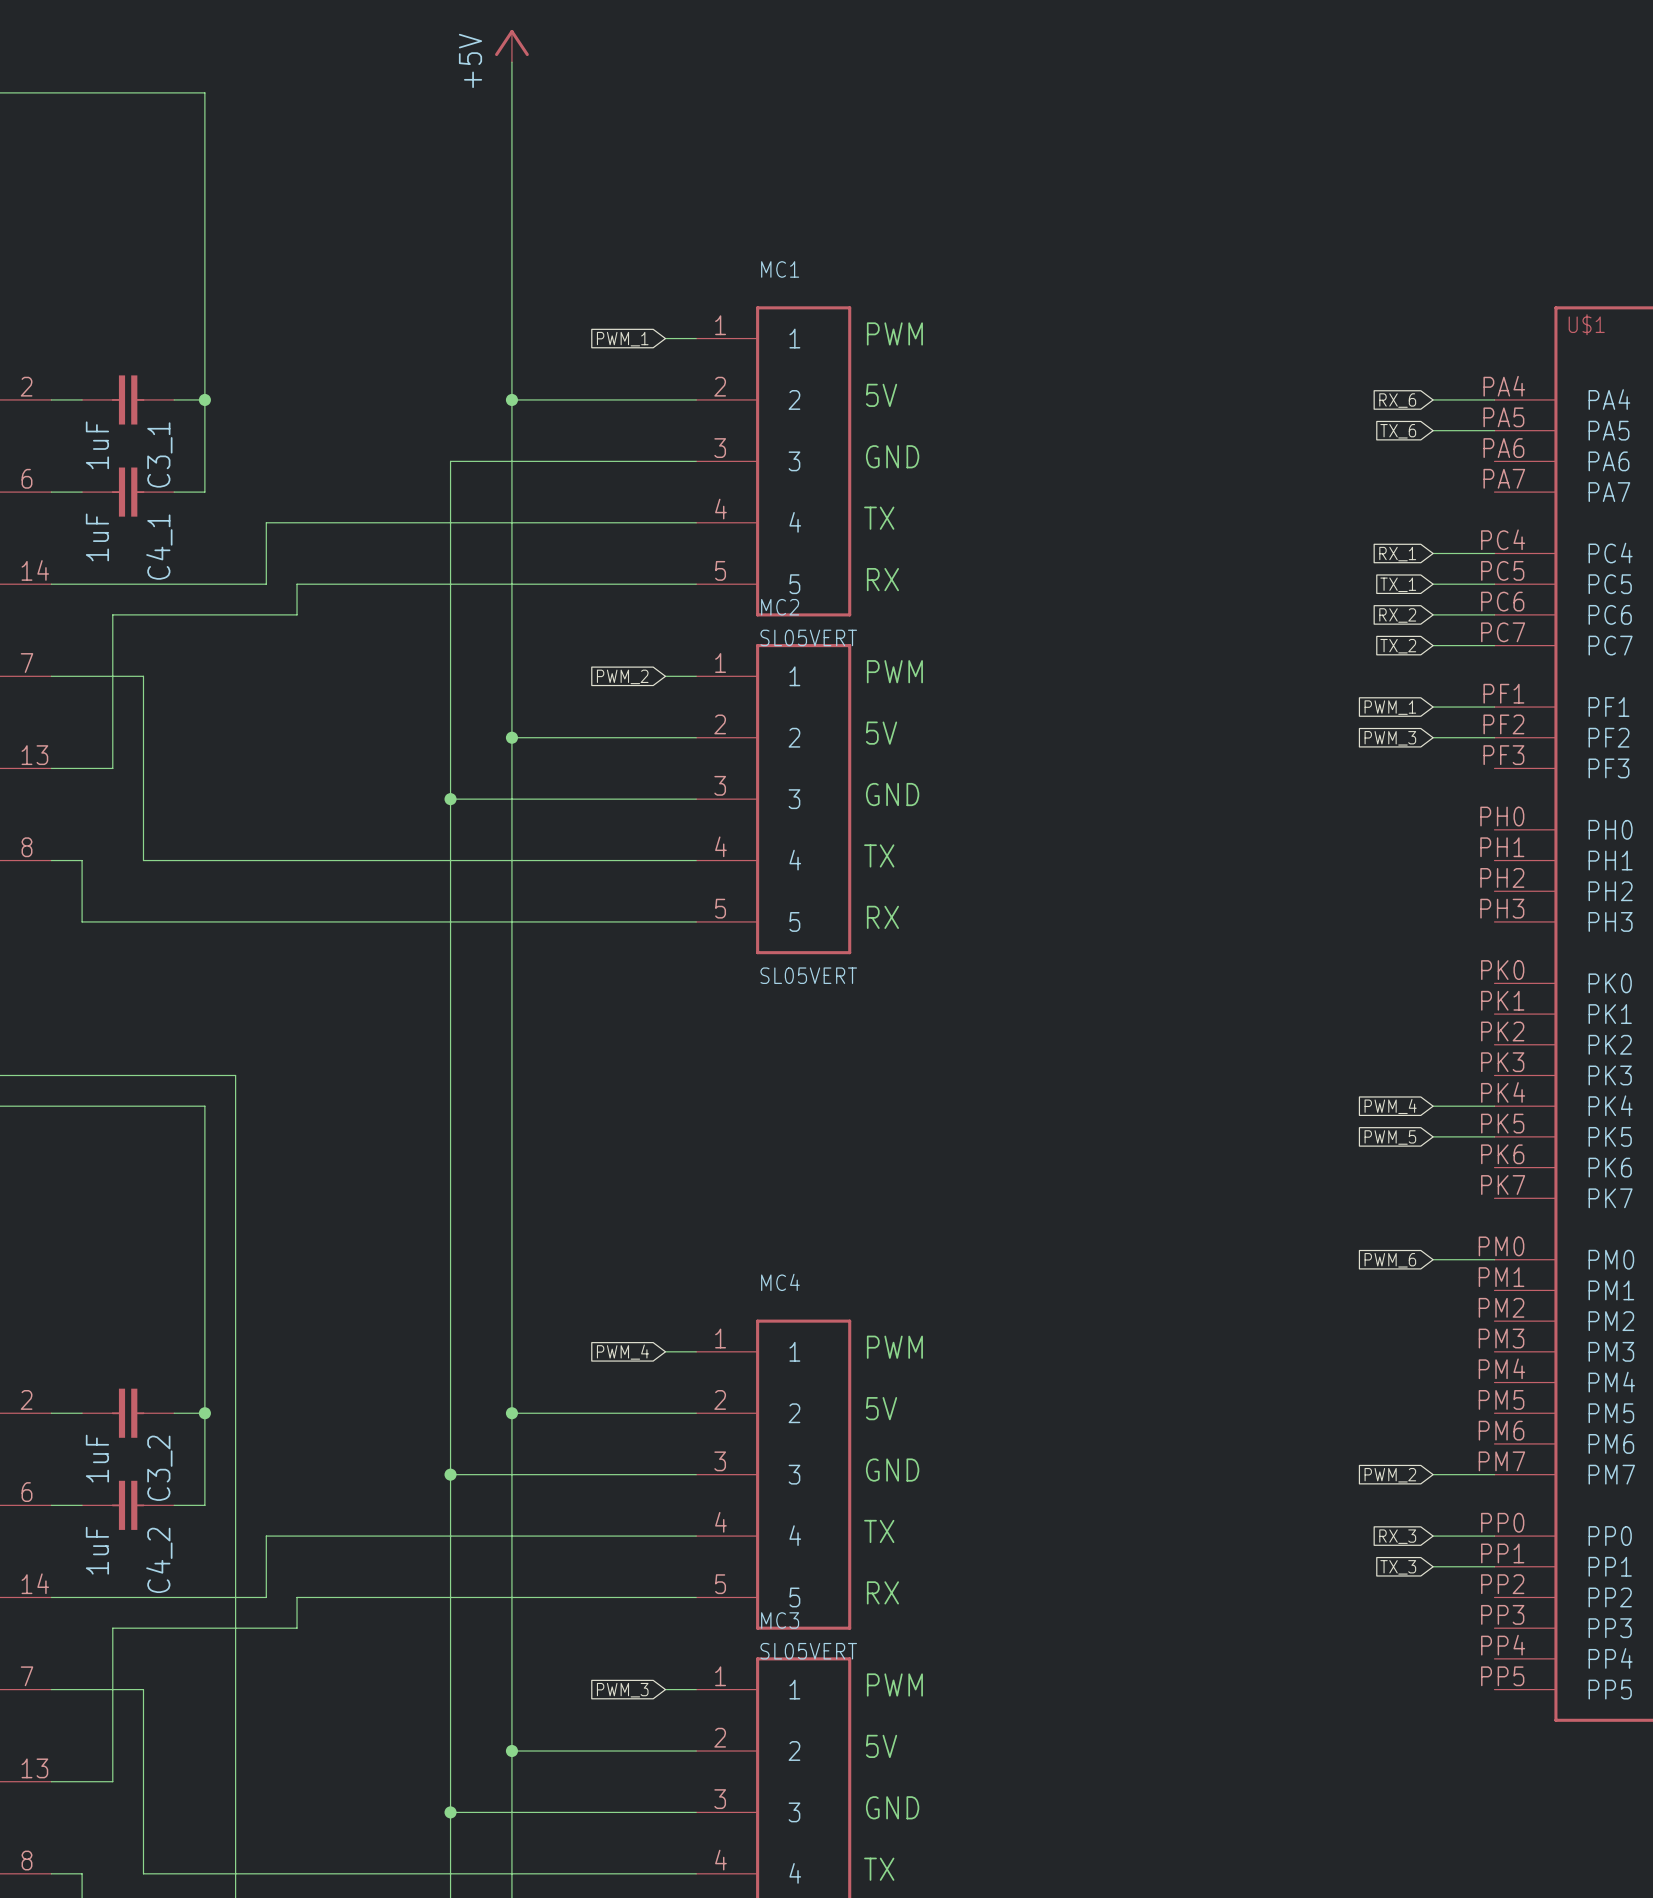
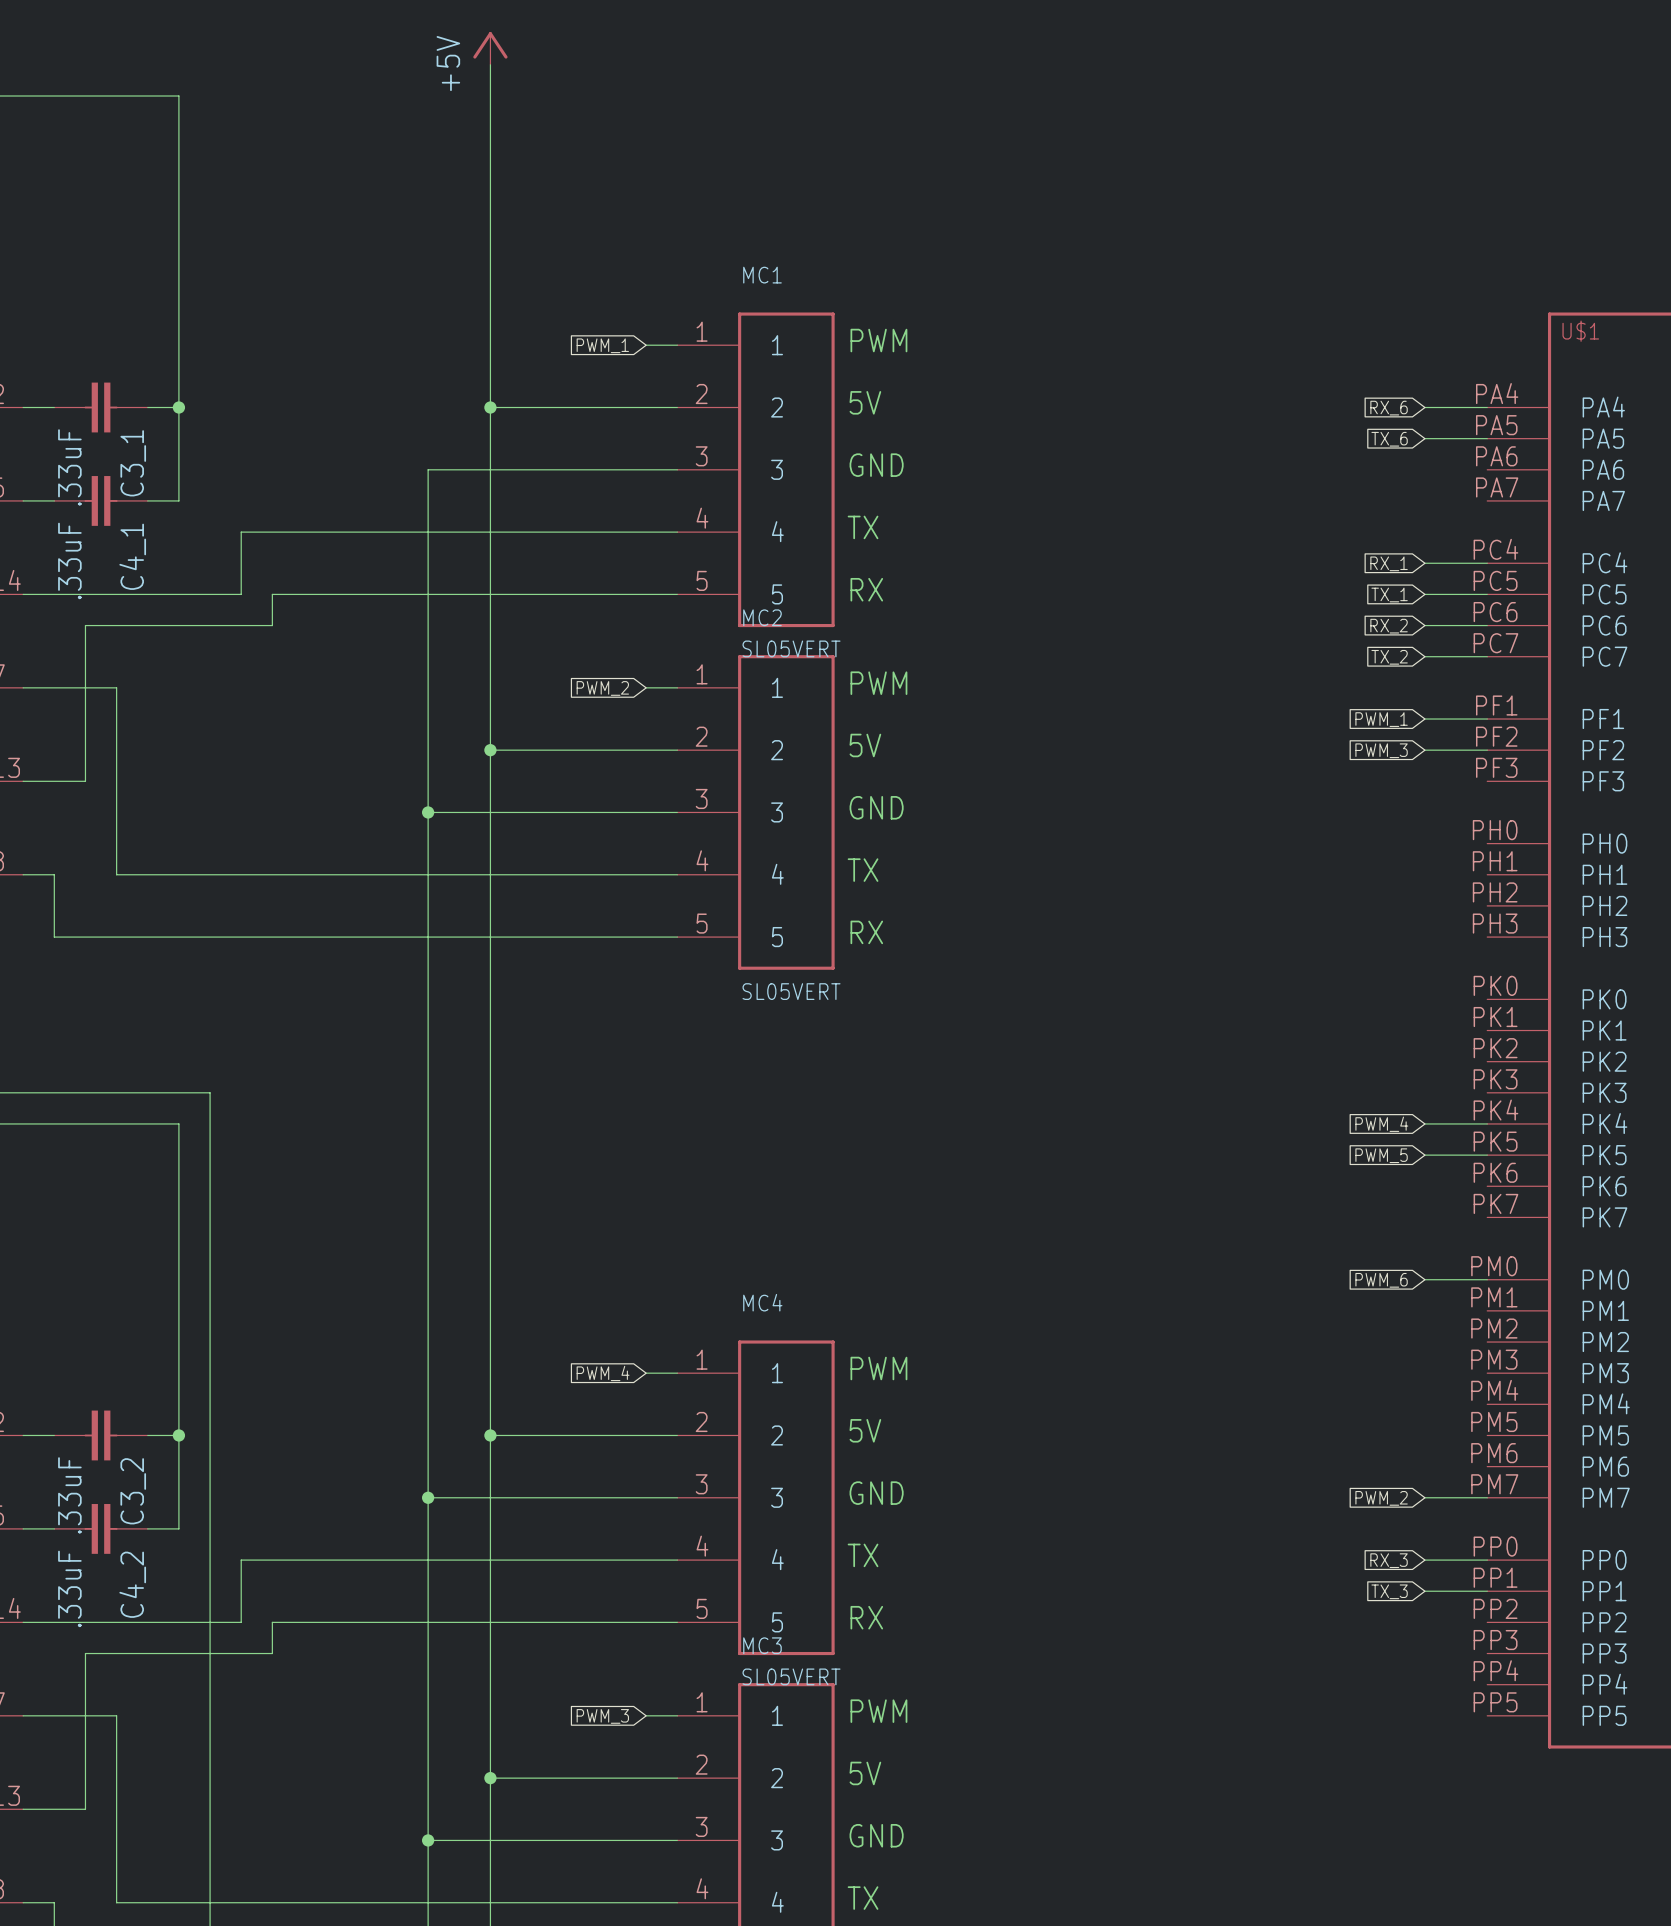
C3_1 value: 1uF (97, 445) -> .33uF (69, 467)
C4_1 value: 1uF (97, 537) -> .33uF (69, 560)
C3_2 value: 1uF (97, 1458) -> .33uF (69, 1495)
C4_2 value: 1uF (97, 1550) -> .33uF (69, 1588)

